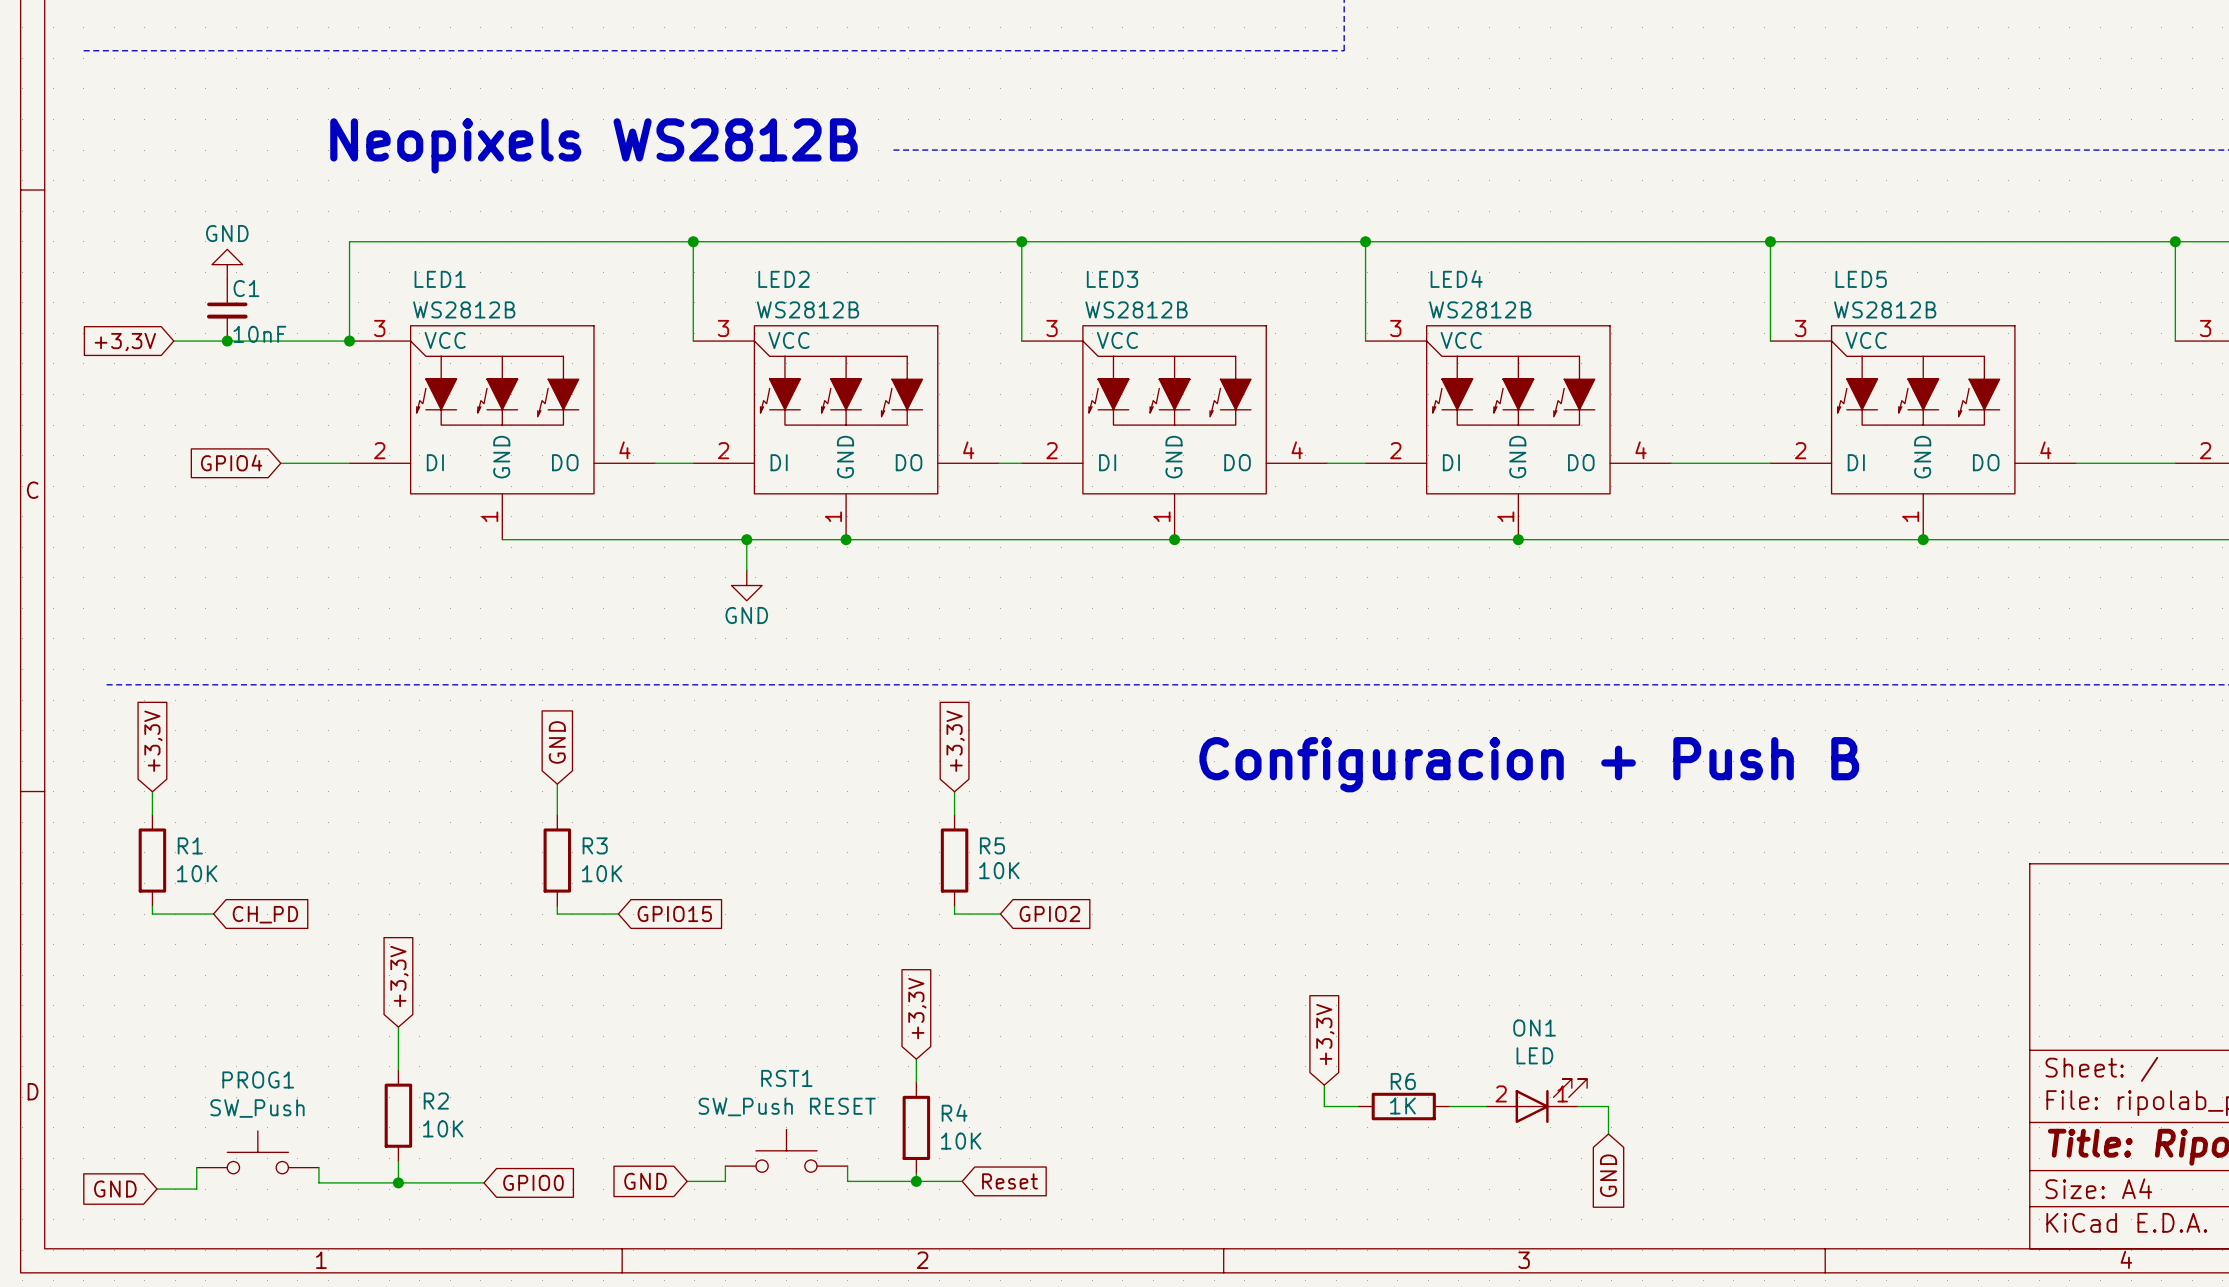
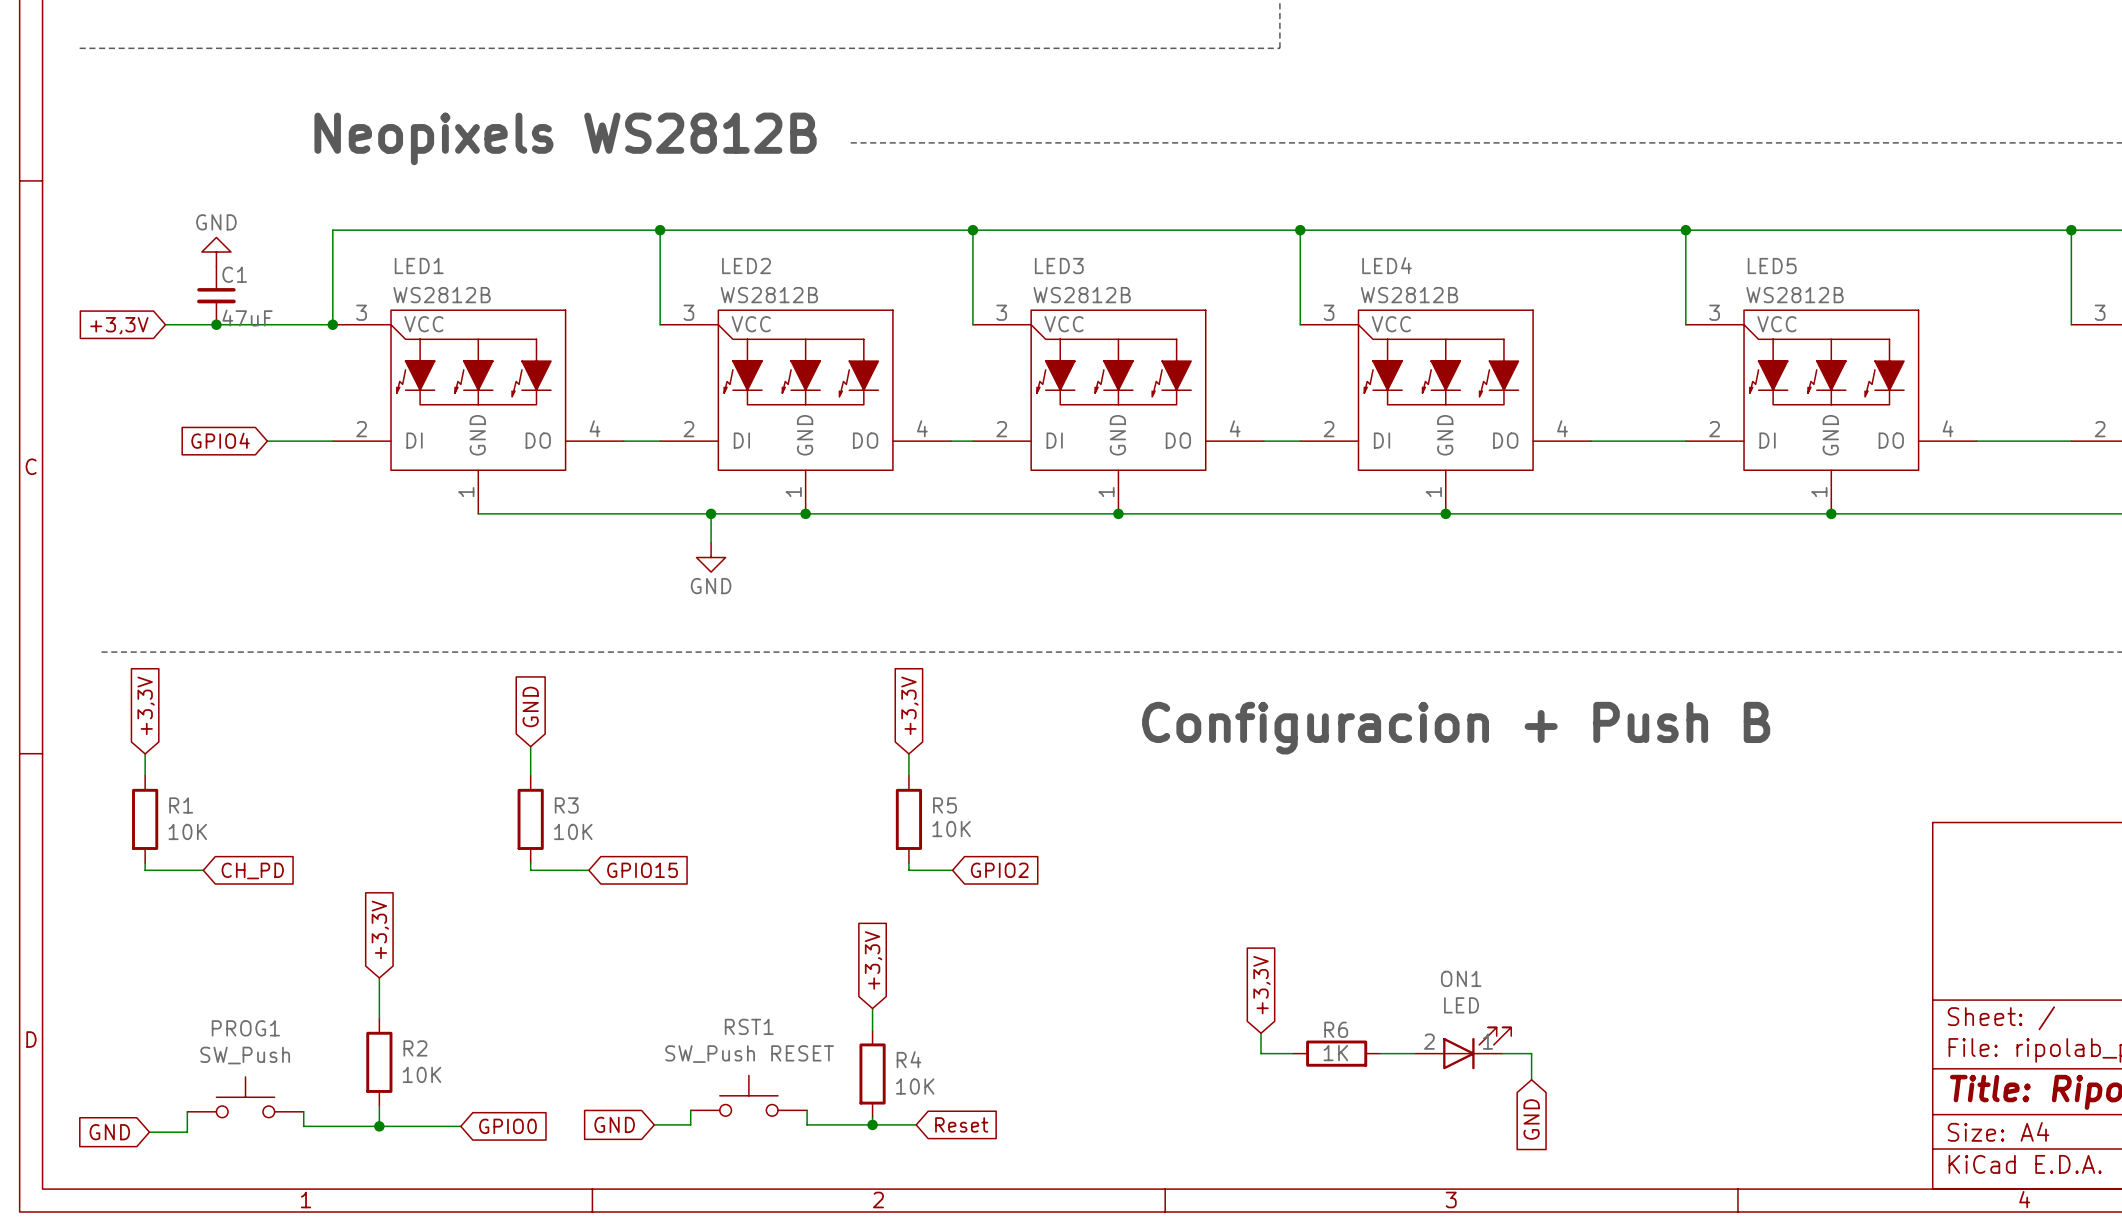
C1 value: 10nF (259, 334) -> 47uF (247, 318)

